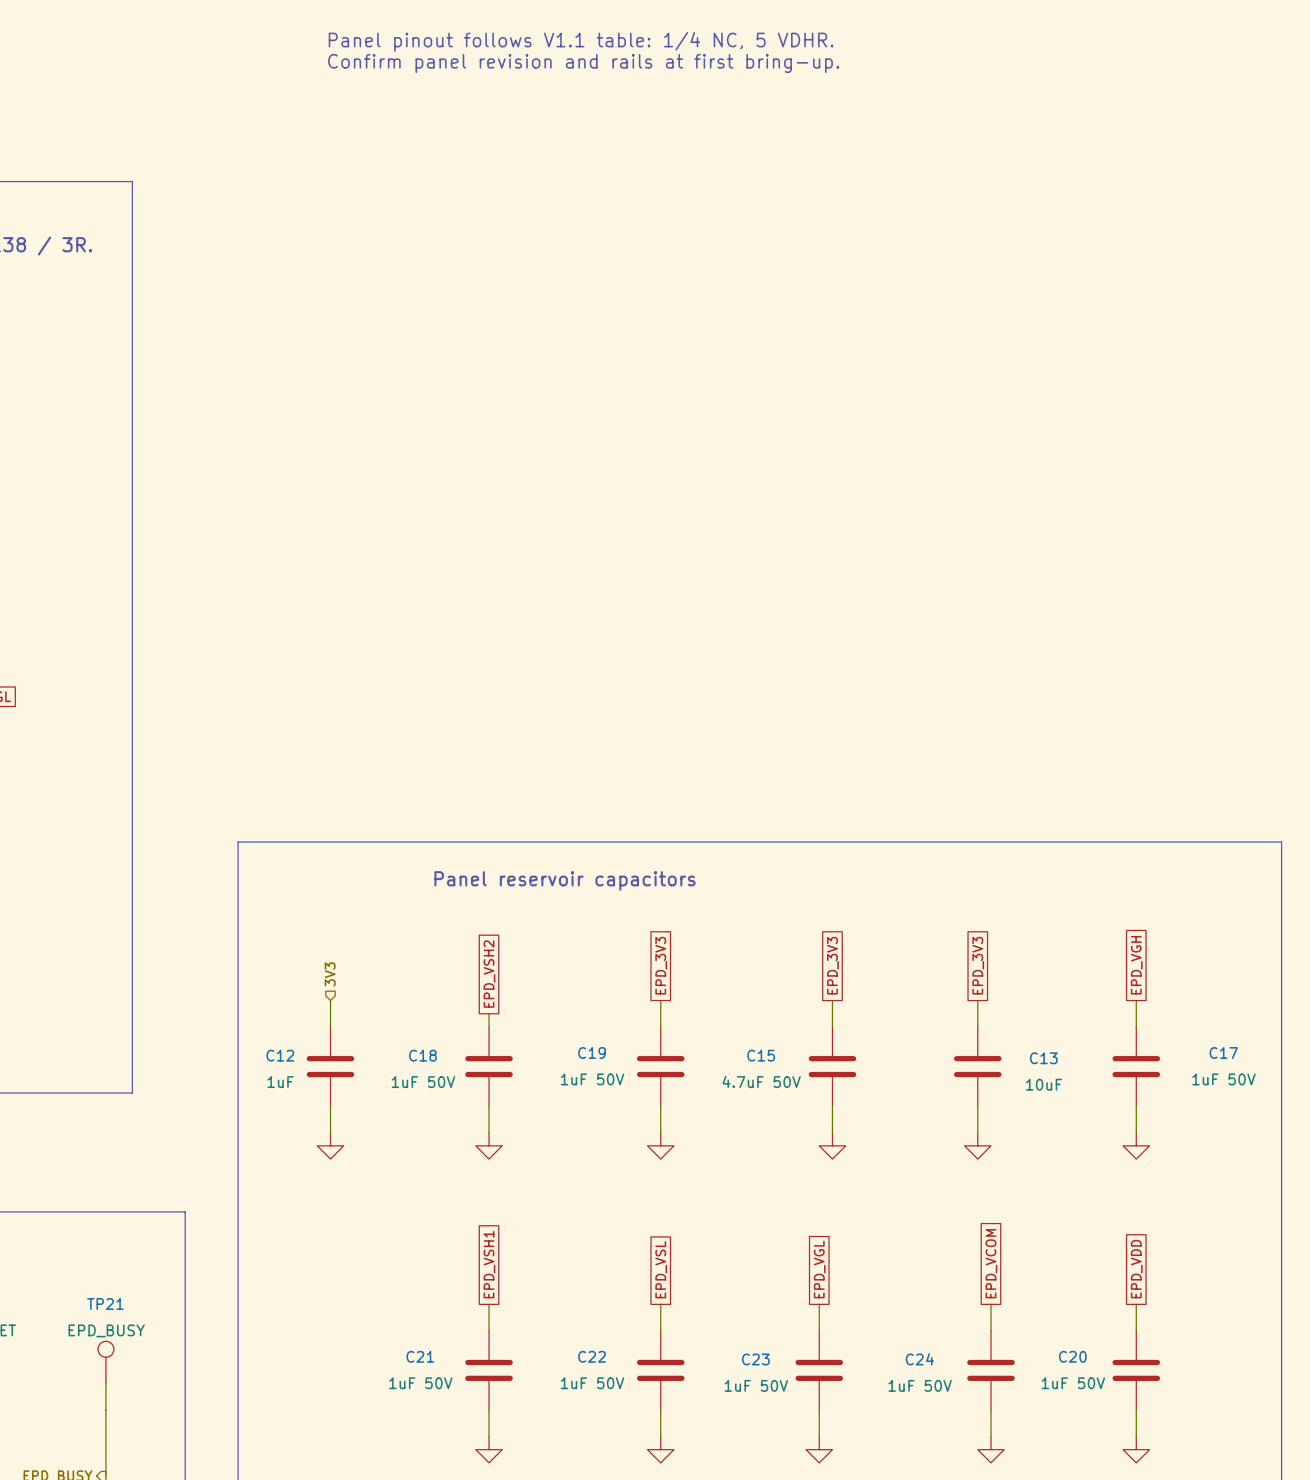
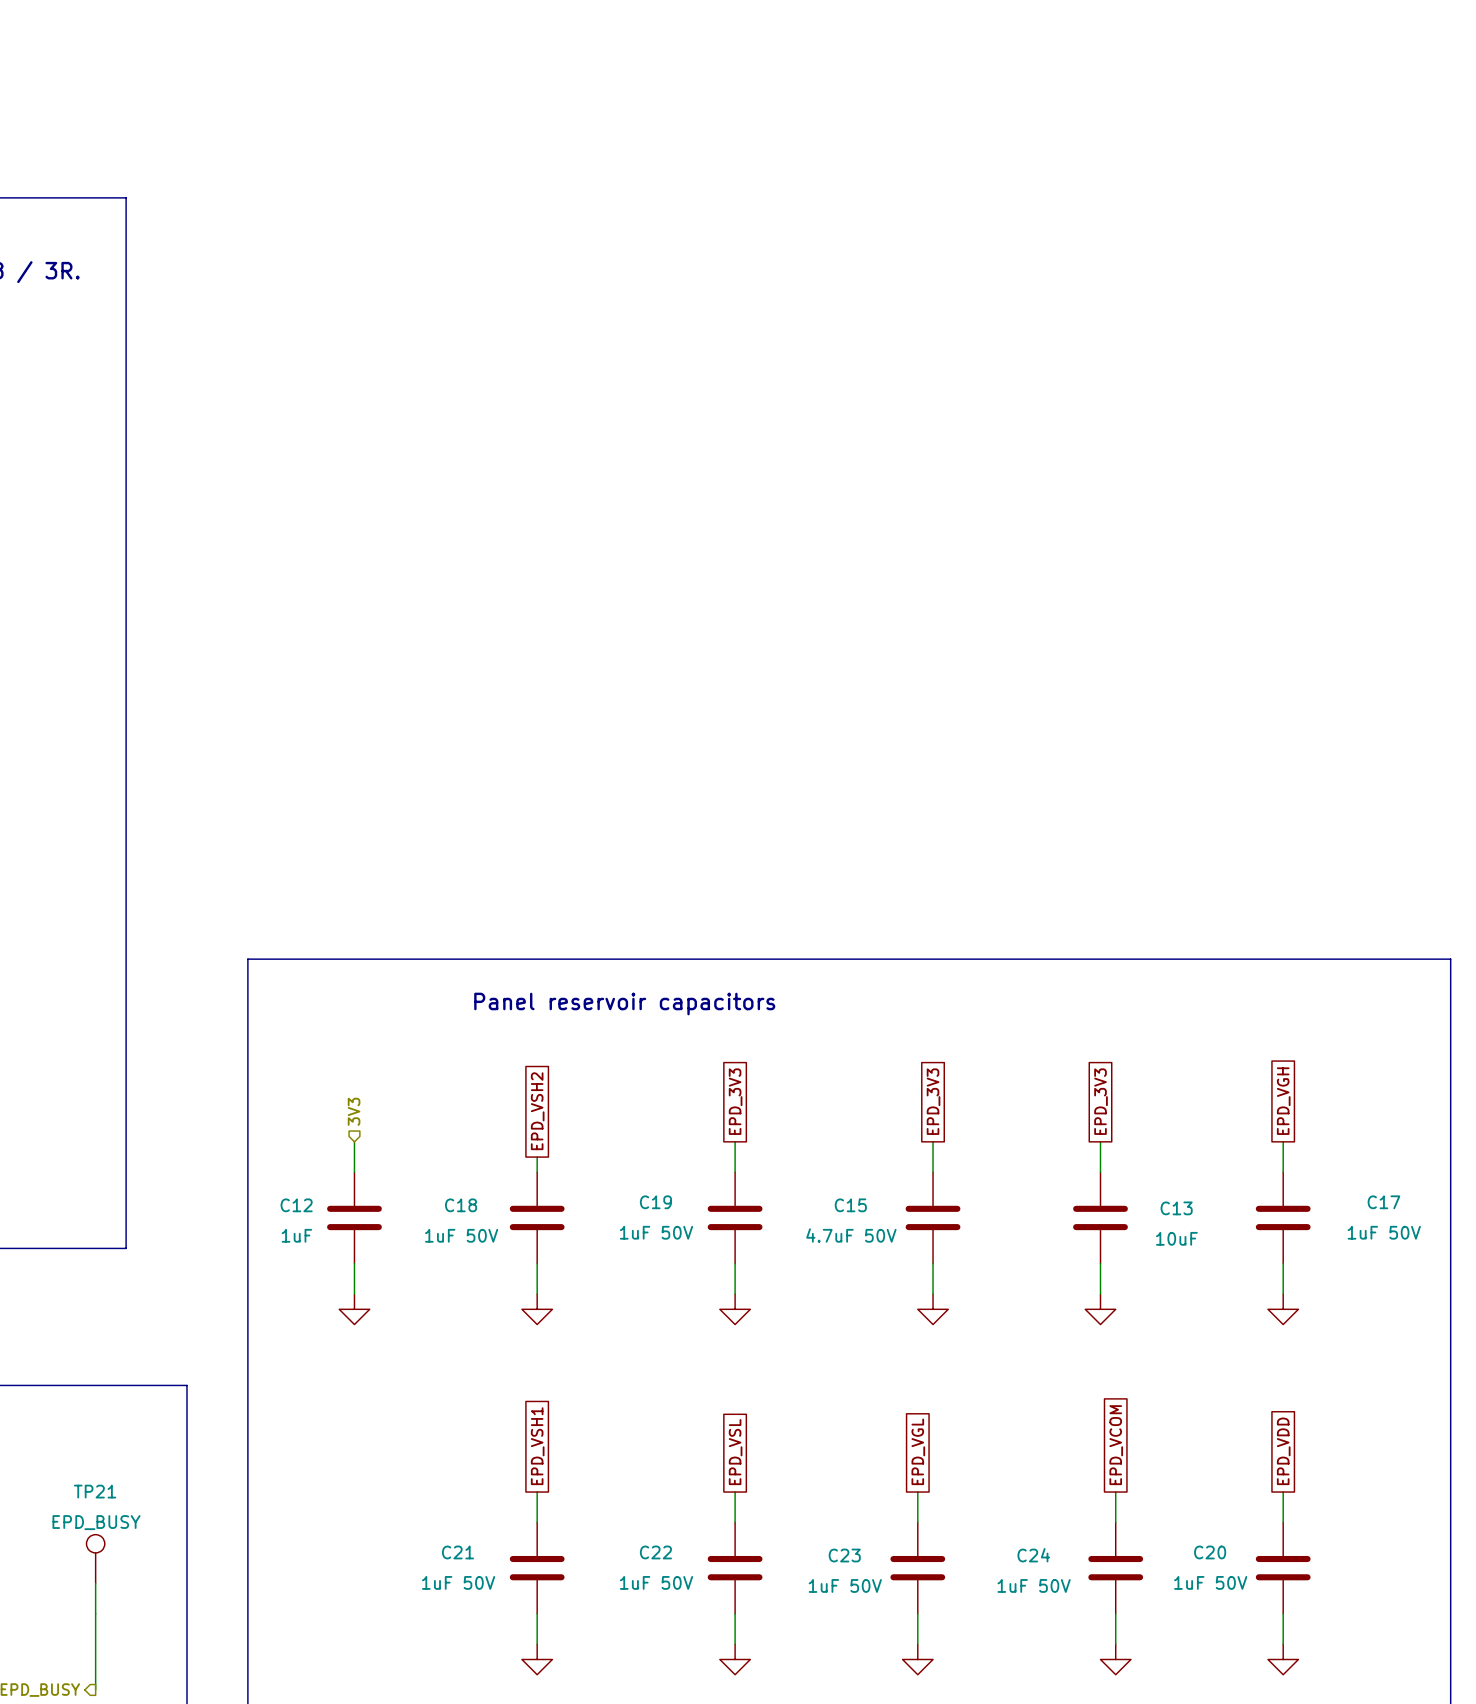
text: Panel pinout follows V1.1 table: 1/4 NC, 5 VDHR. (581, 41) -> none
text: Confirm panel revision and rails at first bring-up. (583, 63) -> none

